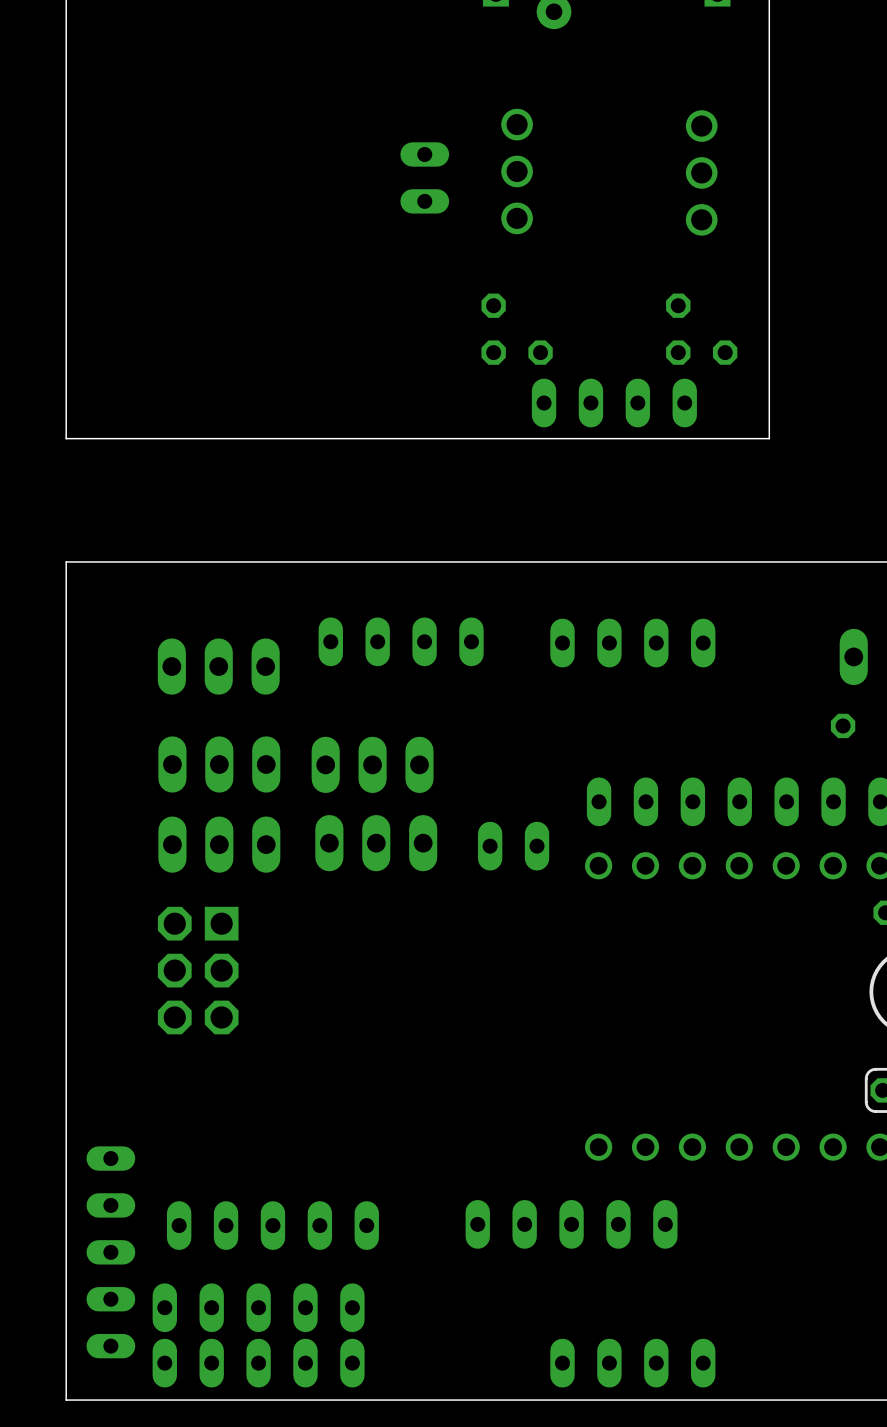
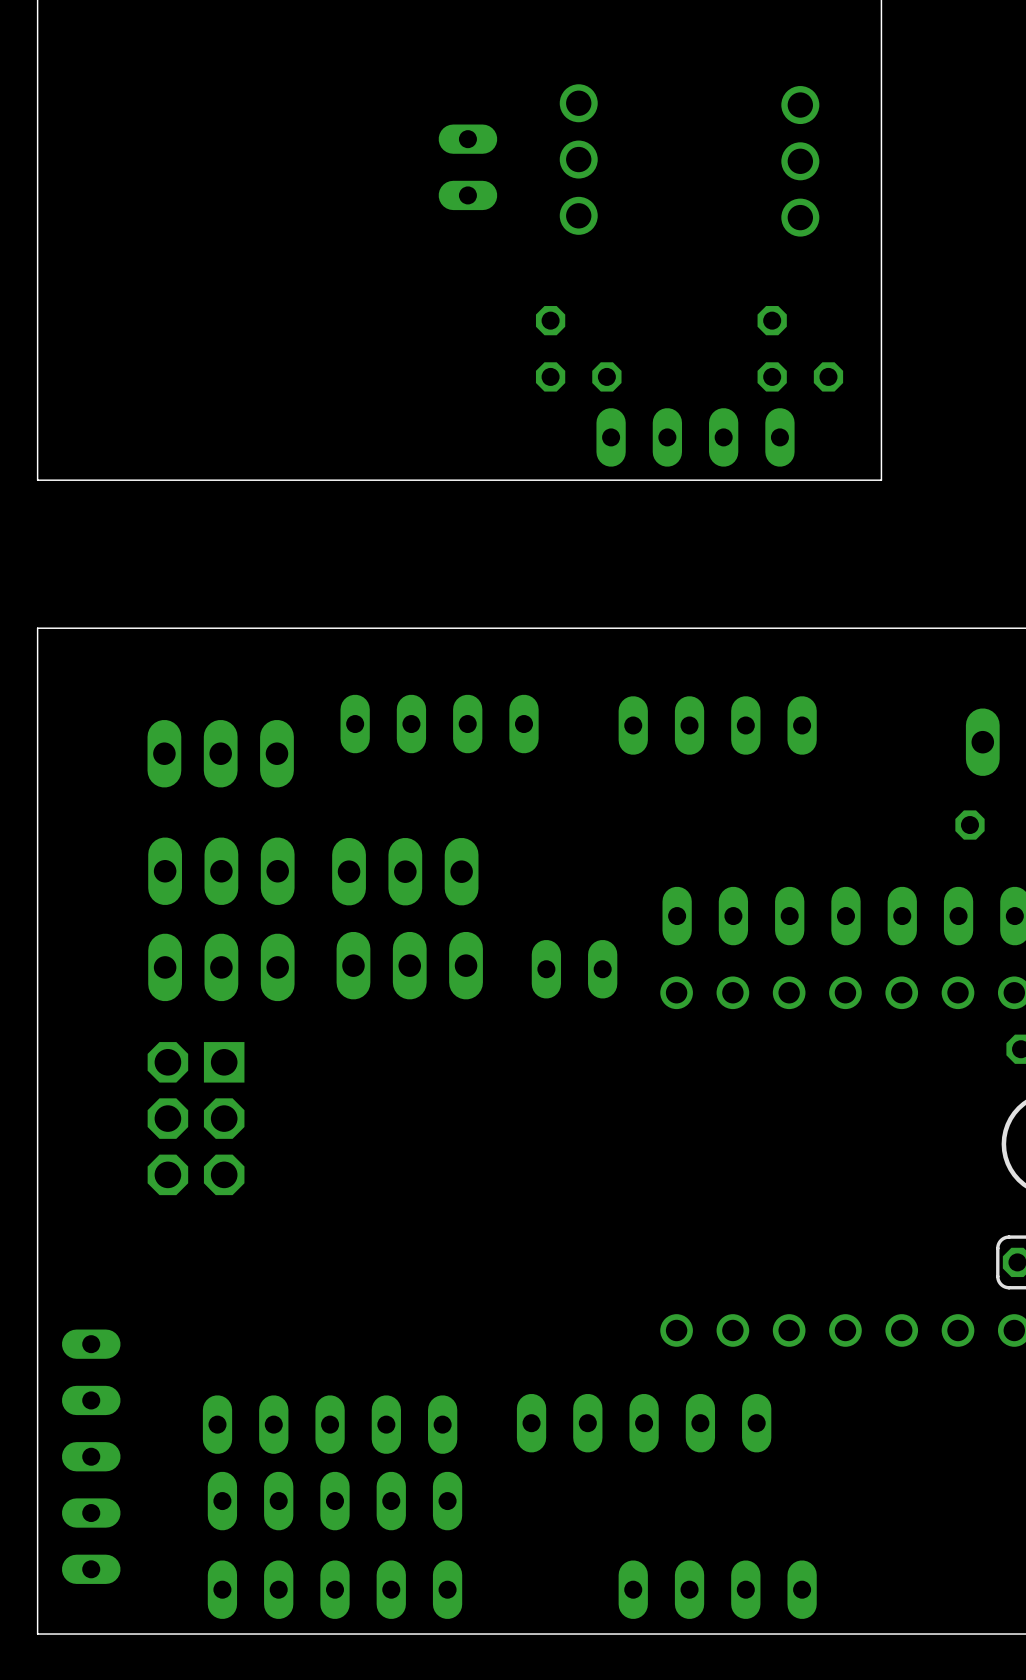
part position: (272, 1225) -> (330, 1424)
part: none -> (334, 1501)
part: (258, 1307) -> none
part: (258, 1363) -> none
part: none -> (334, 1589)

